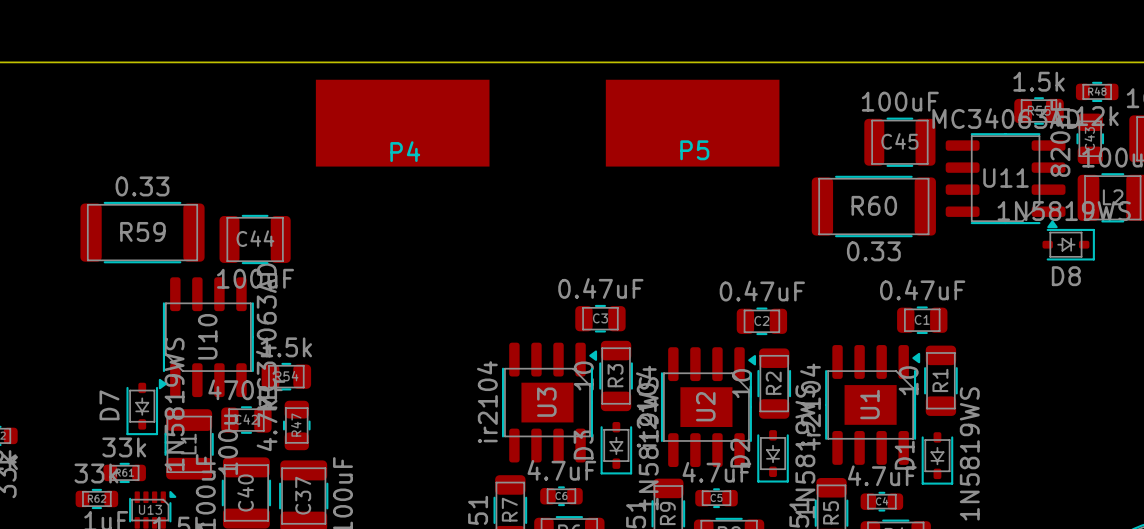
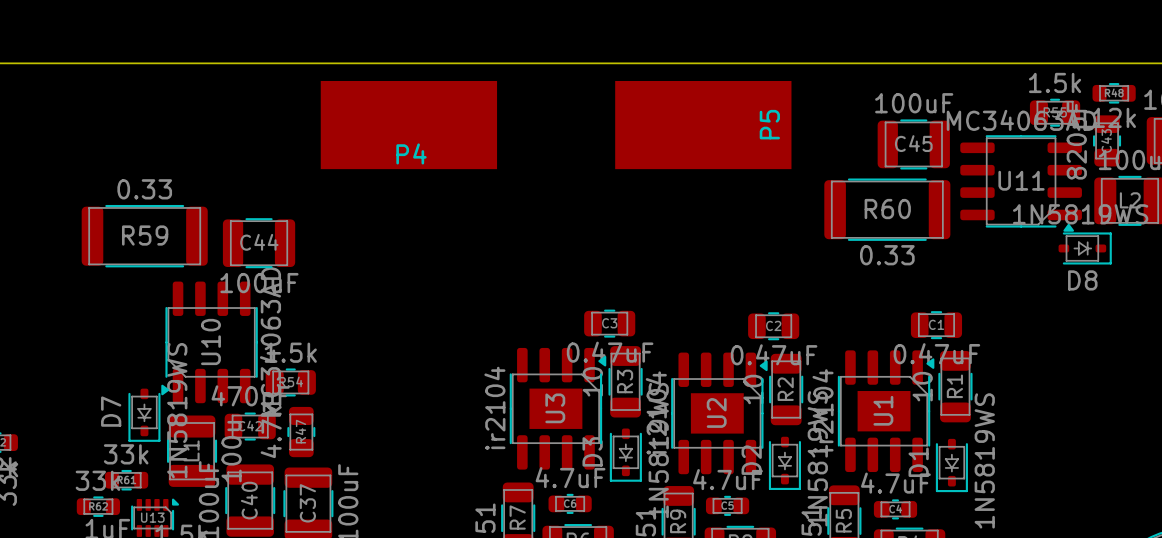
P5 name rotation: 0° (694, 150) -> 90° counterclockwise (769, 124)
P5 name position: P5 (694, 150) -> P5 (769, 124)
C3 value position: 0.47uF (600, 288) -> 0.47uF (610, 352)
C1 value position: 0.47uF (922, 289) -> 0.47uF (936, 353)
C2 value position: 0.47uF (762, 291) -> 0.47uF (774, 354)

